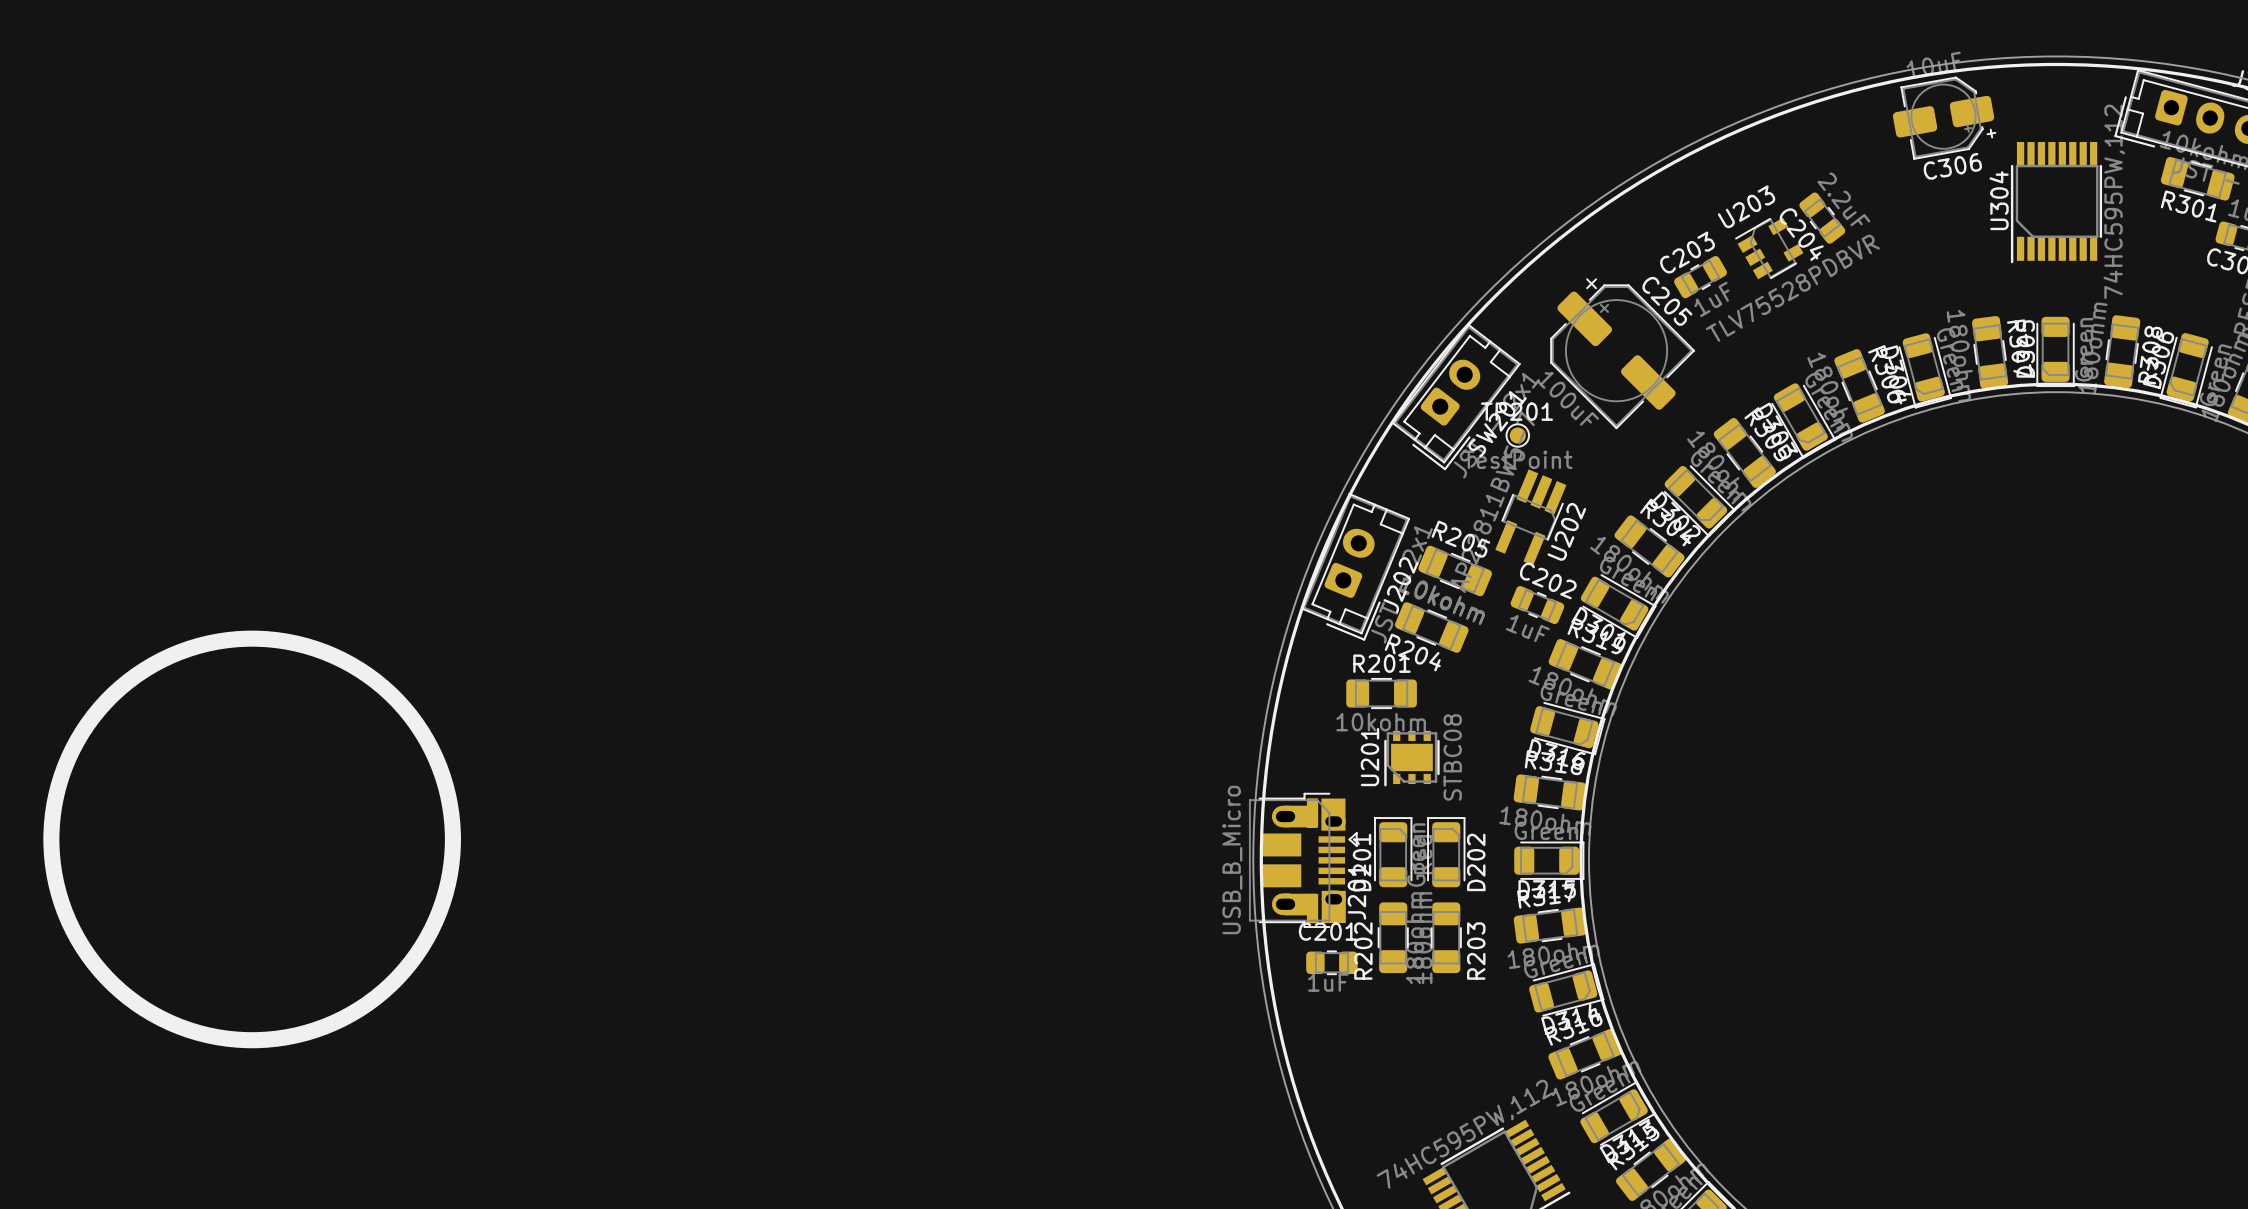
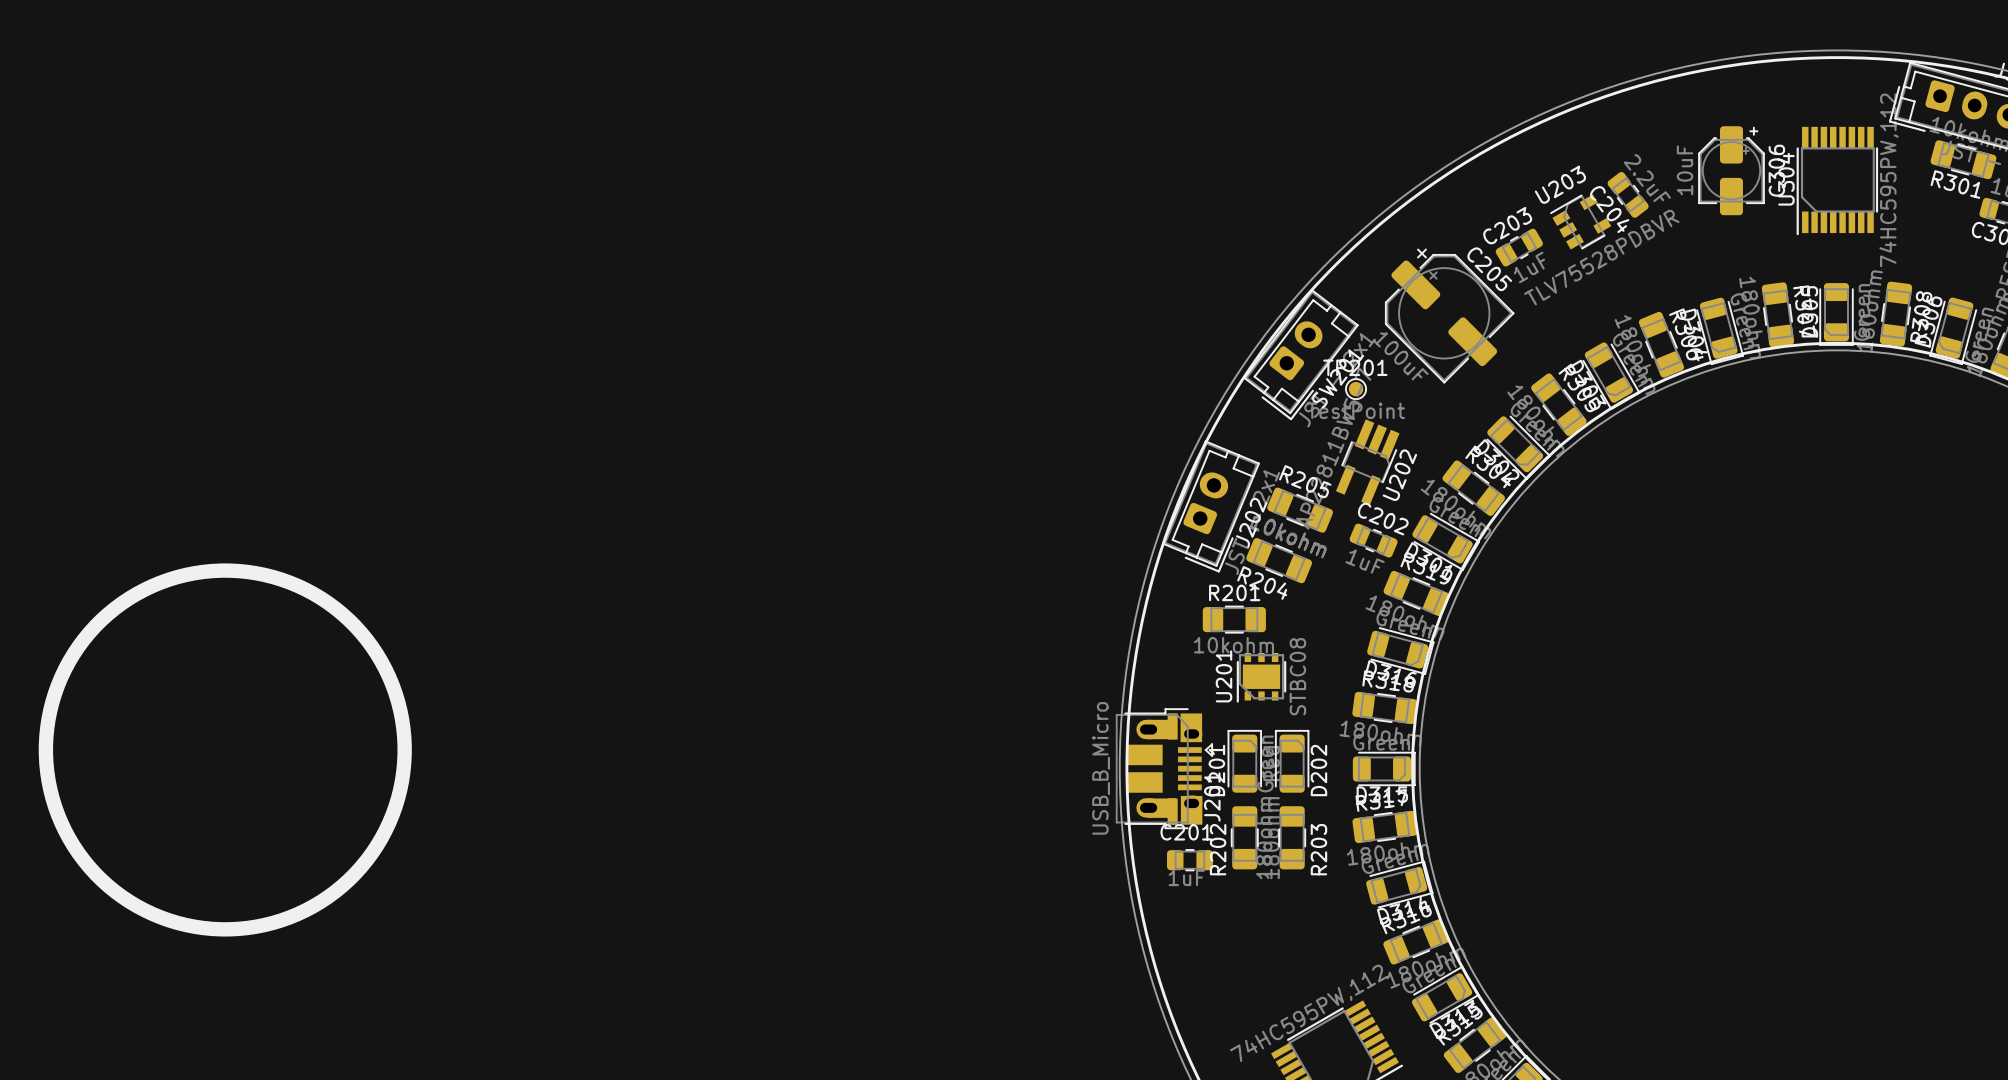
C306 rotation: 0° (1944, 118) -> 79.8° counterclockwise (1731, 170)
C306 position: (1944, 118) -> (1731, 170)

